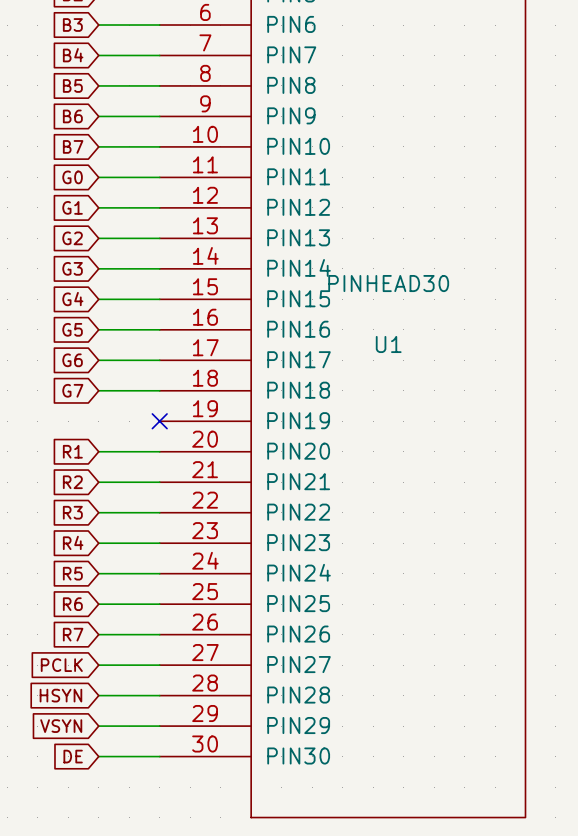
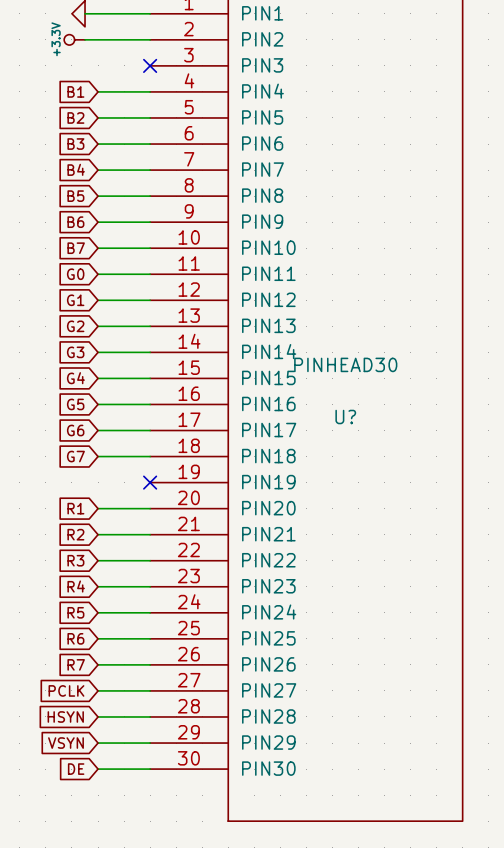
U1 name: U1 (388, 344) -> U? (345, 417)

